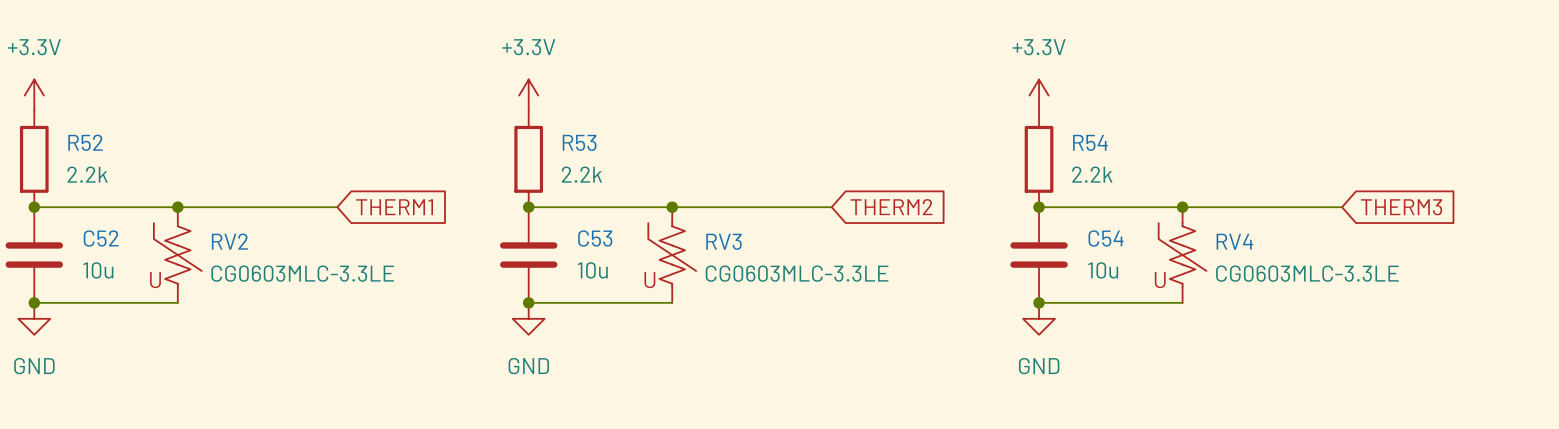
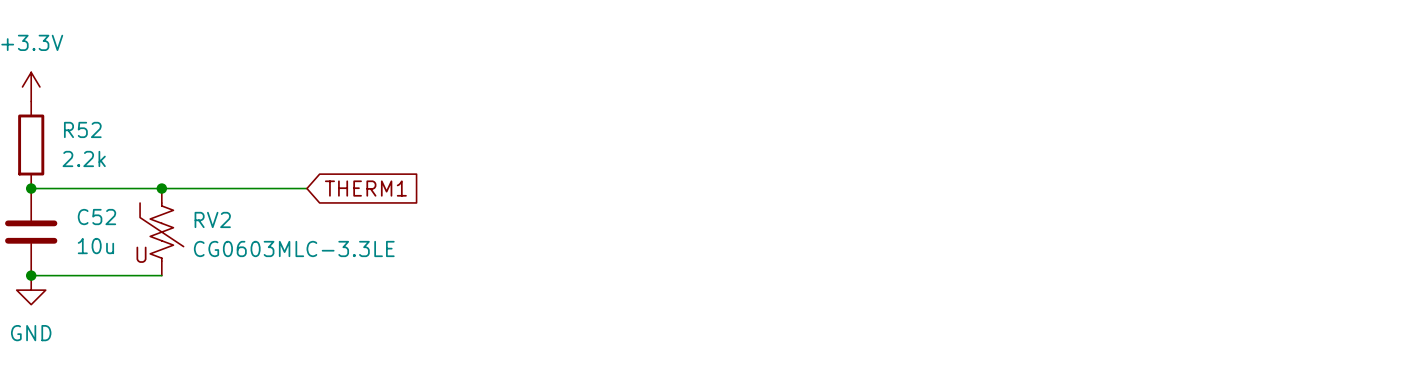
power symbol: +3.3V (528, 95) -> none
power symbol: +3.3V (1039, 95) -> none
R53: 2.2k (528, 159) -> none
R54: 2.2k (1039, 159) -> none
wire: (528, 207) (831, 207) -> none
junction: (528, 207) -> none
junction: (672, 207) -> none
global label: THERM2 (891, 207) -> none
wire: (1039, 207) (1342, 207) -> none
junction: (1039, 207) -> none
junction: (1182, 207) -> none
global label: THERM3 (1401, 207) -> none
C53: 10u (528, 255) -> none
RV3: CG0603MLC-3.3LE (672, 255) -> none
C54: 10u (1039, 255) -> none
RV4: CG0603MLC-3.3LE (1182, 255) -> none
wire: (528, 302) (672, 302) -> none
junction: (528, 302) -> none
wire: (1039, 302) (1182, 302) -> none
junction: (1039, 302) -> none
power symbol: GND (528, 318) -> none
power symbol: GND (1039, 318) -> none

